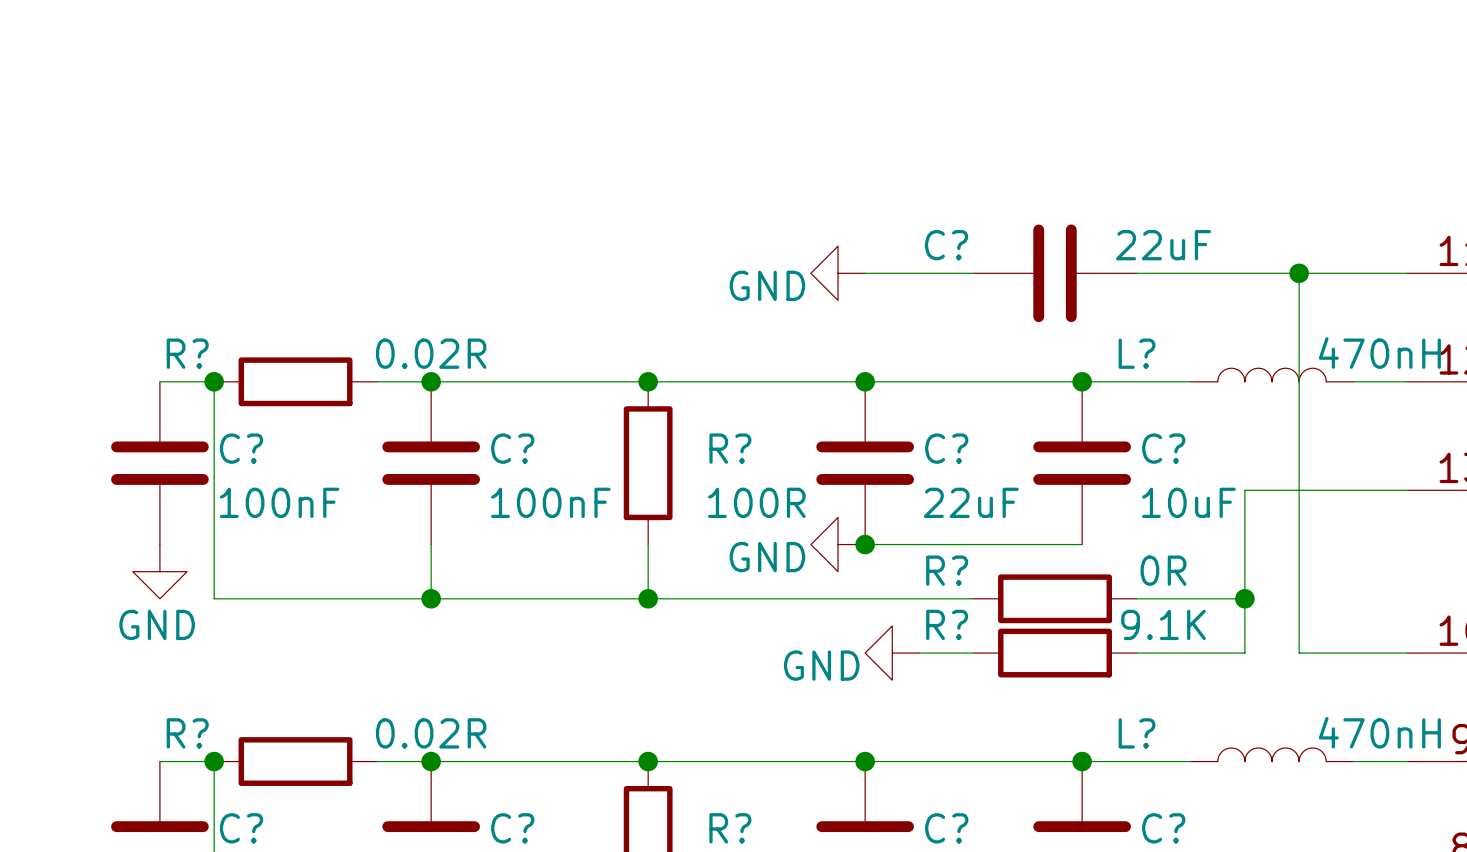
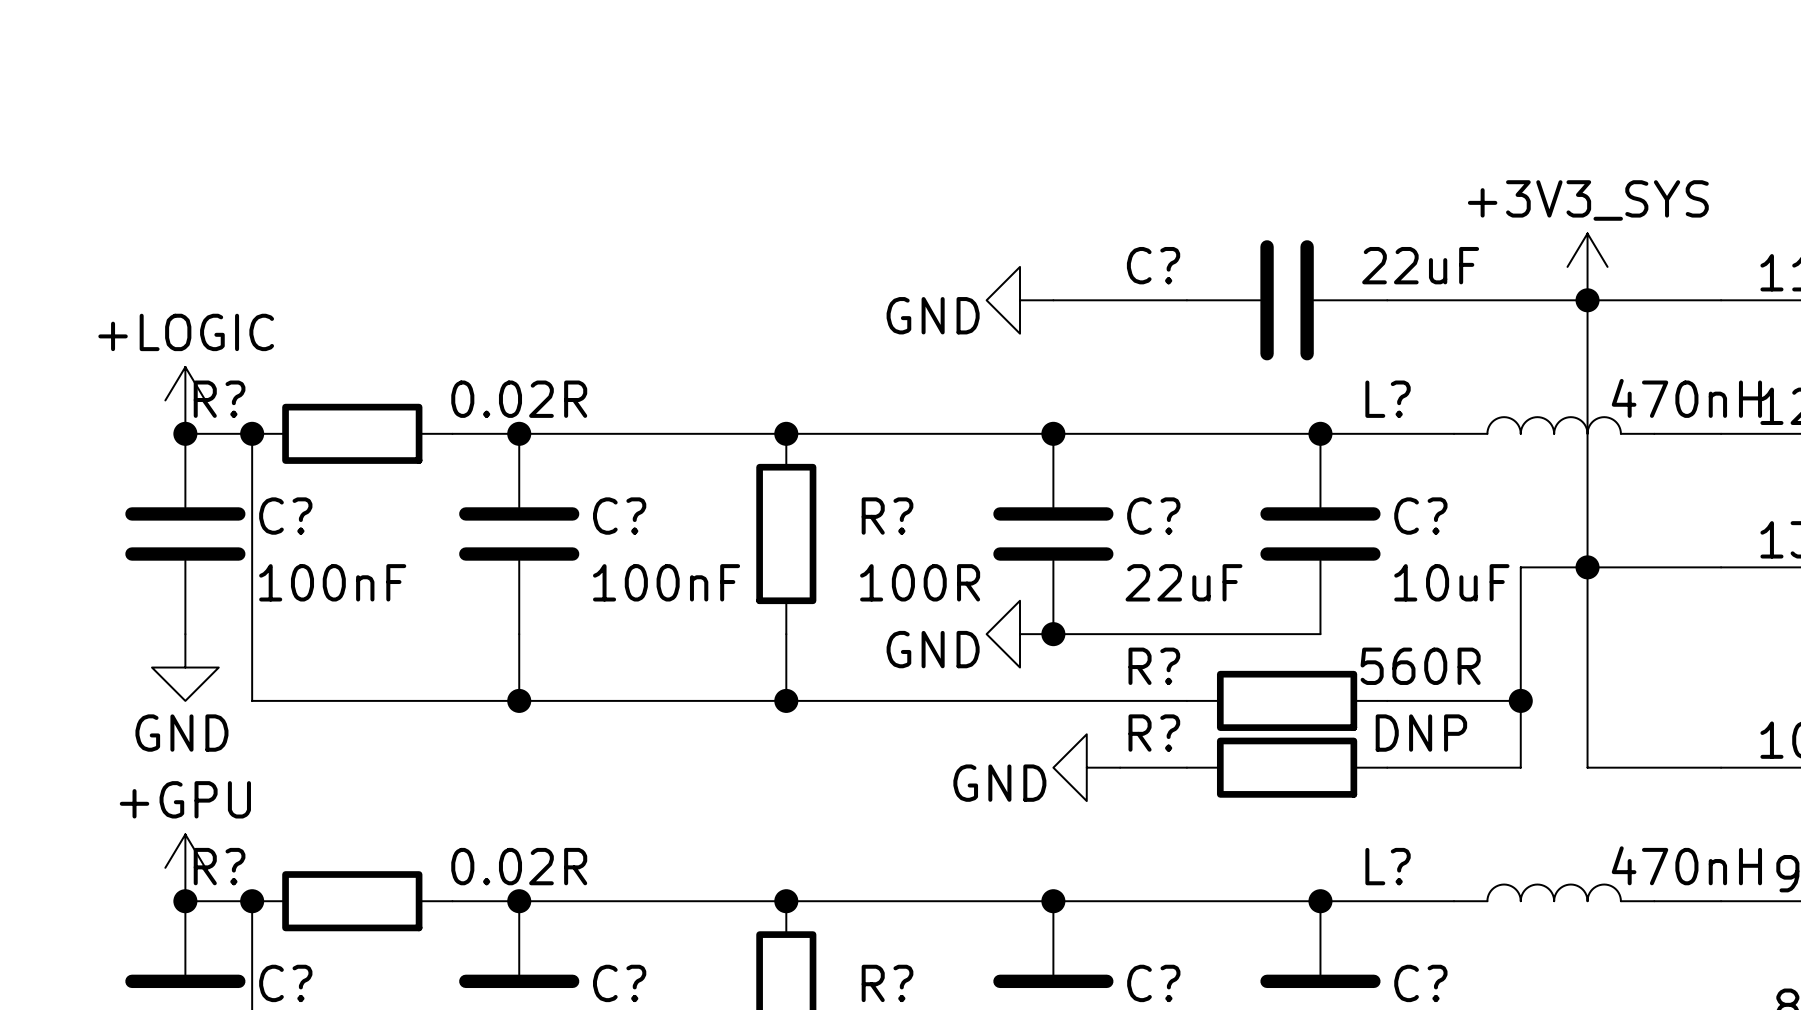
power symbol: none -> +3V3_SYS (1587, 266)
power symbol: none -> +LOGIC (185, 400)
junction: none -> (185, 433)
junction: none -> (1587, 567)
R? value: 0R (1163, 570) -> 560R (1420, 666)
R? value: 9.1K (1163, 624) -> DNP (1421, 733)
power symbol: none -> +GPU (185, 867)
junction: none -> (185, 901)

